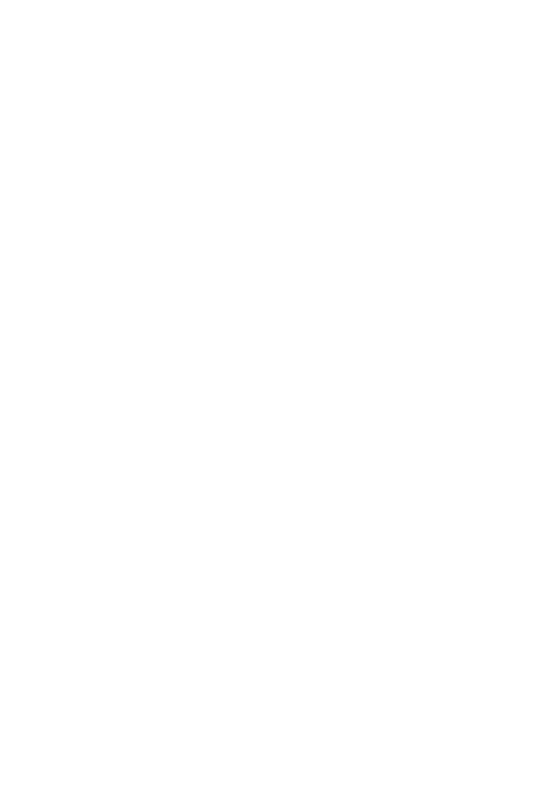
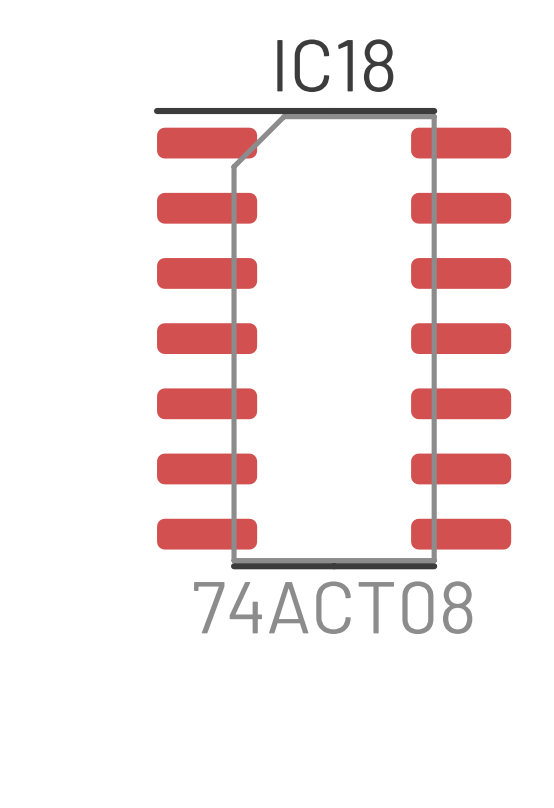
IC18: none -> 74ACT08 (332, 338)

